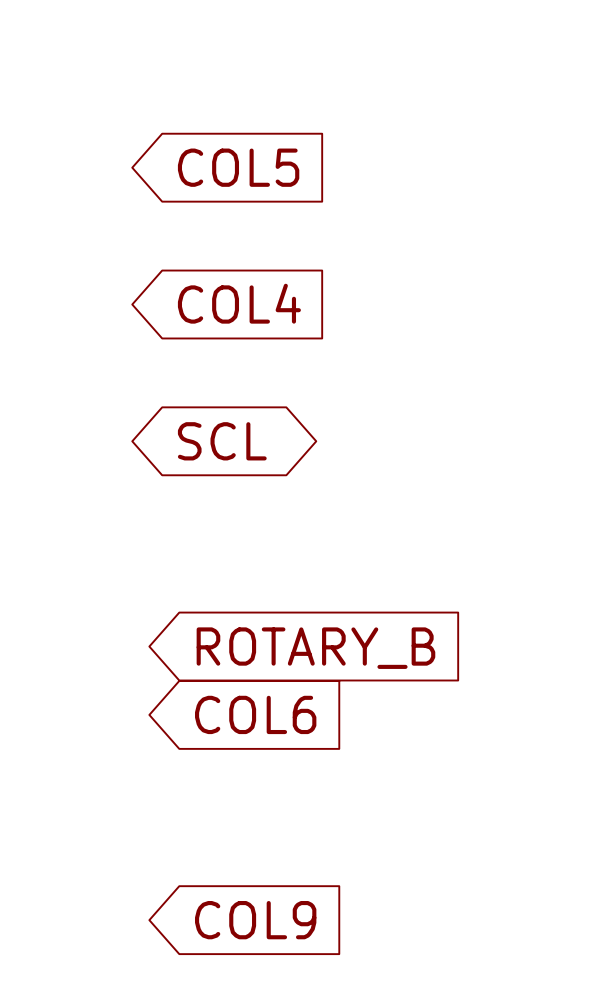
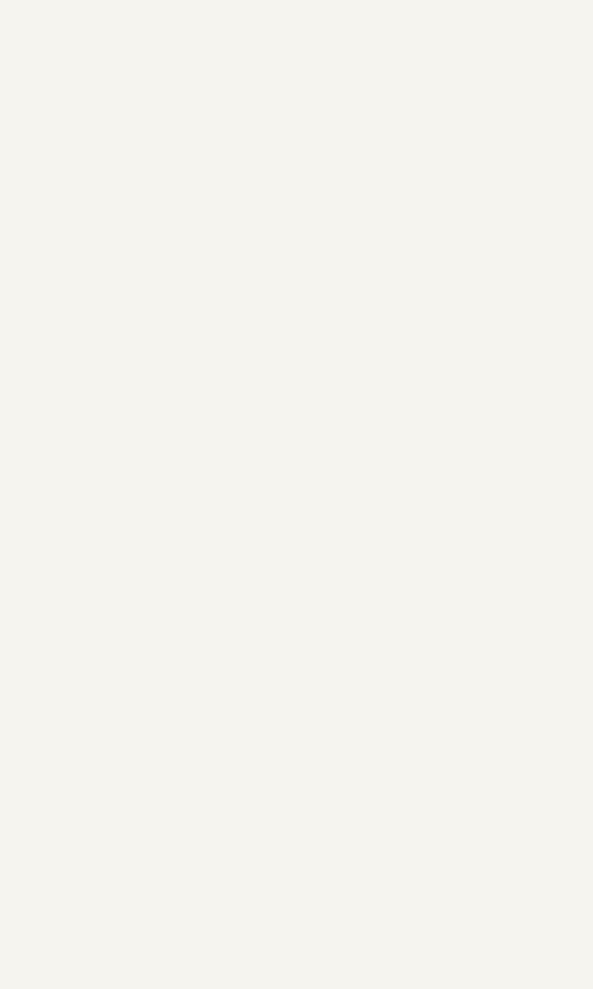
global label: COL5 (238, 167) -> none
global label: COL4 (239, 303) -> none
global label: SCL (222, 441) -> none
global label: ROTARY_B (315, 648) -> none
global label: COL6 (255, 714) -> none
global label: COL9 (255, 920) -> none

